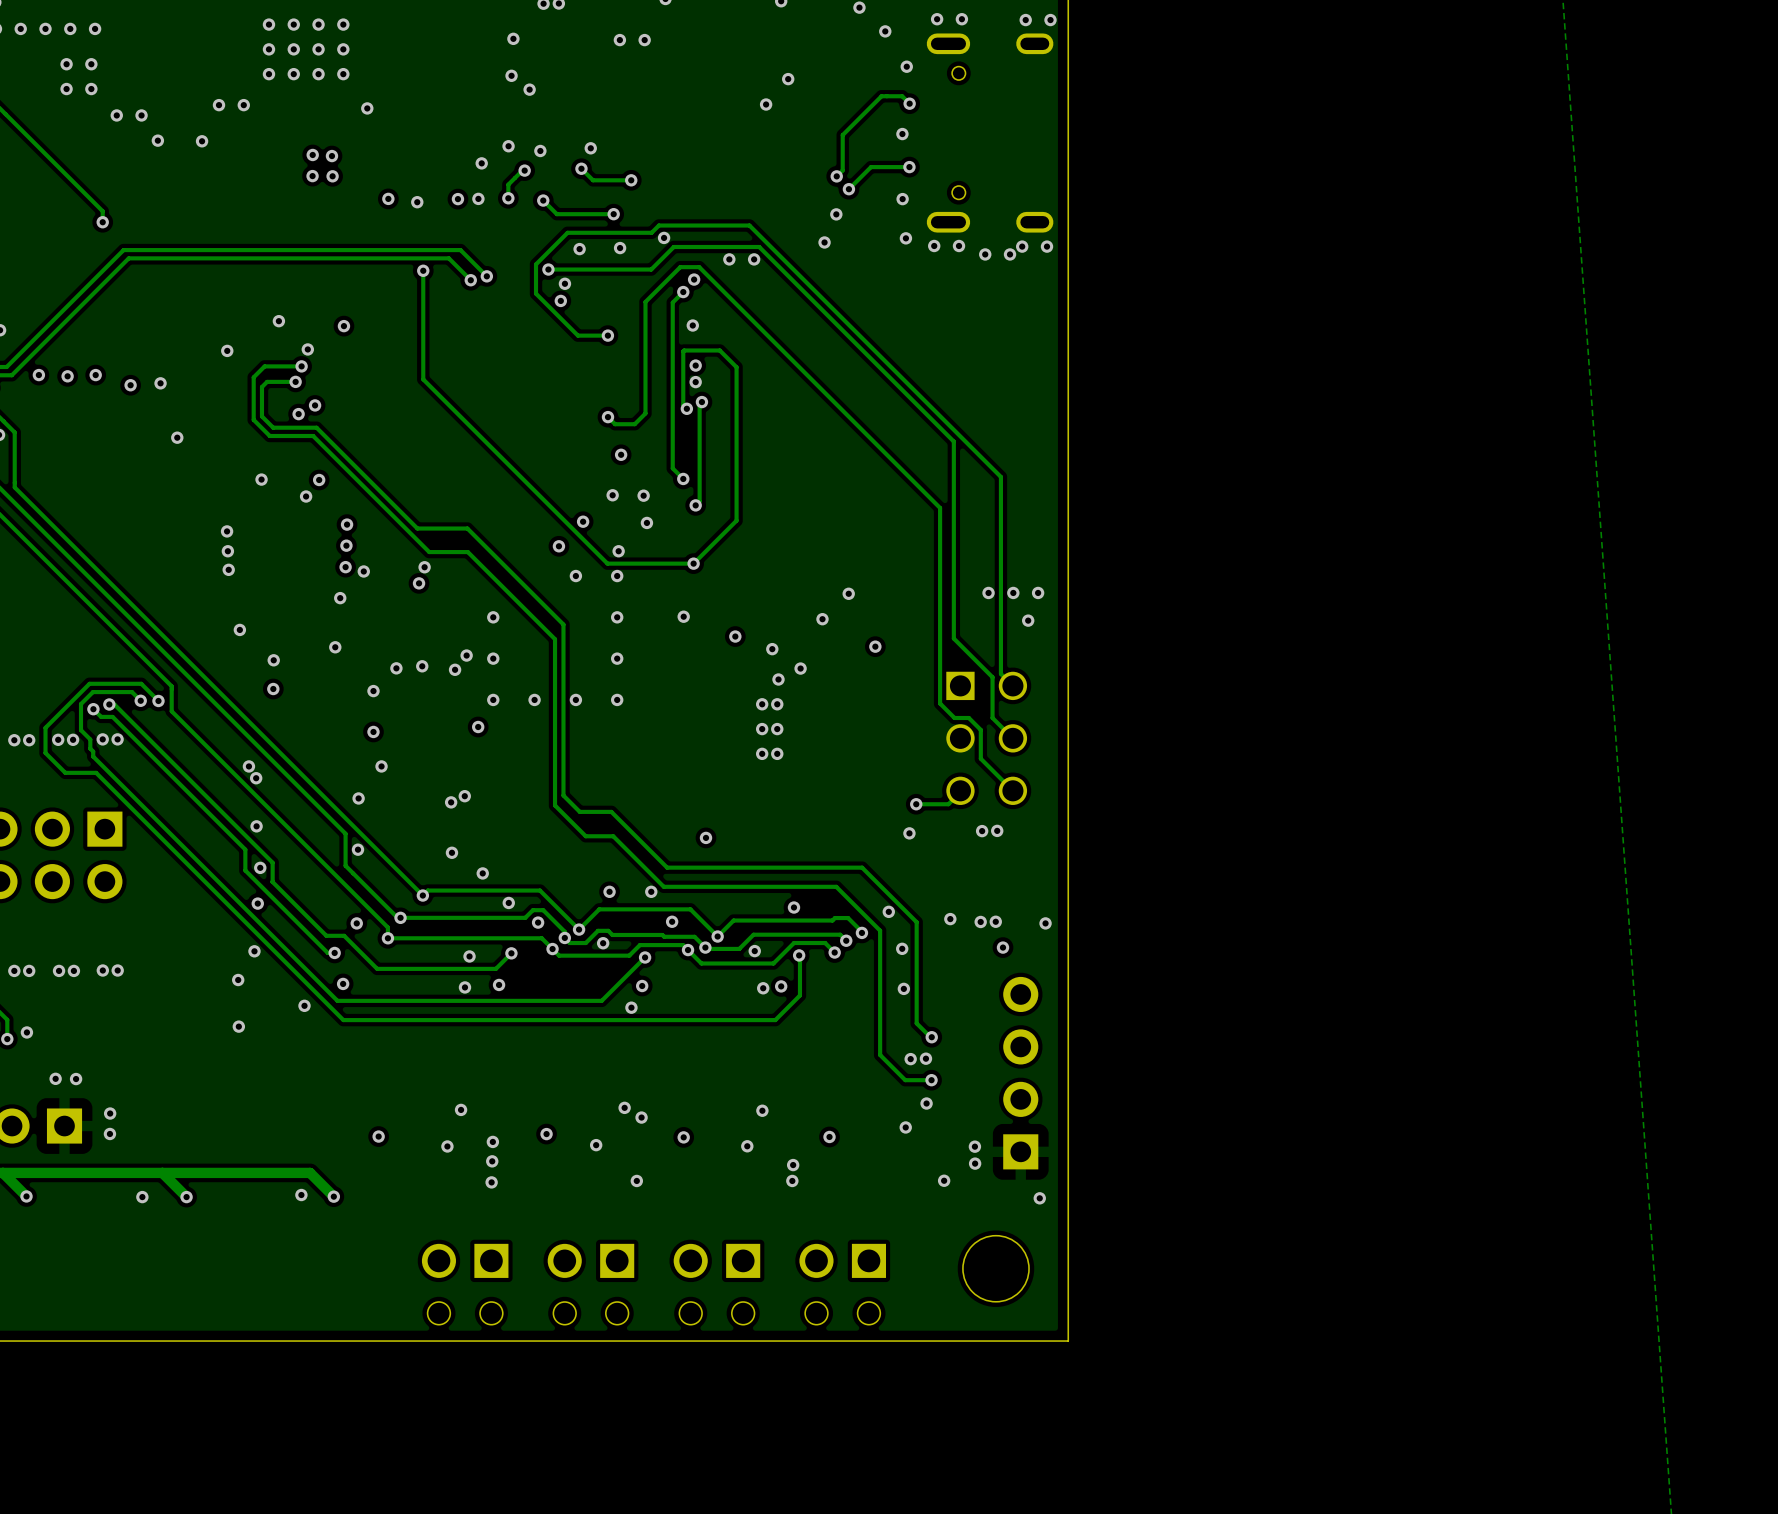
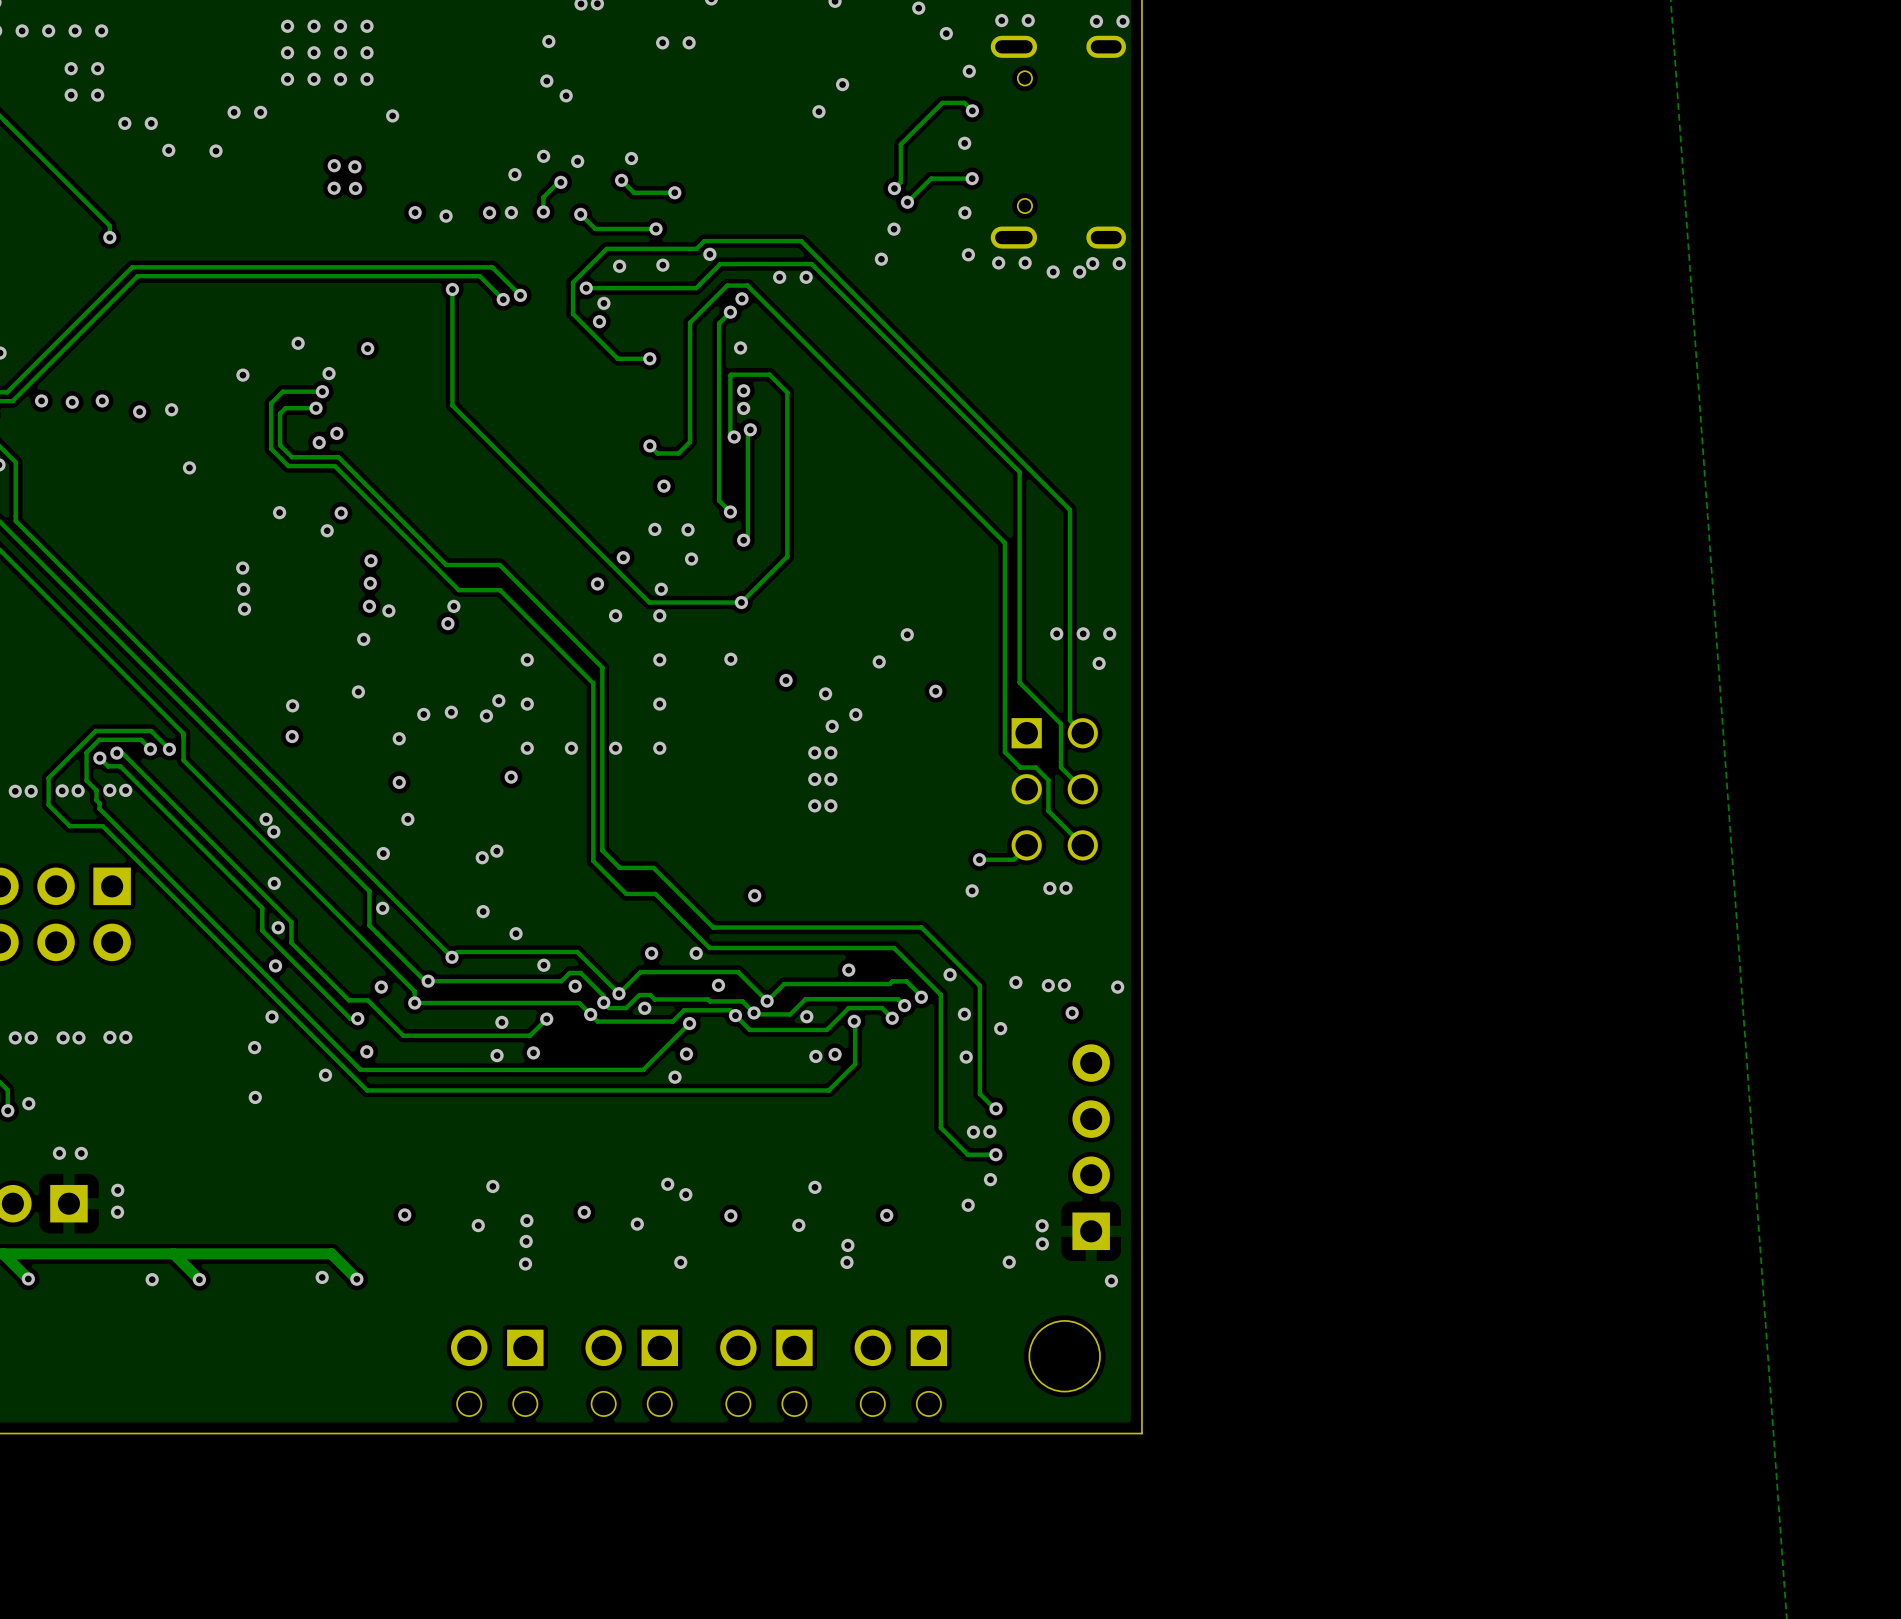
via: (239, 629) -> none
via: none -> (1000, 1028)

